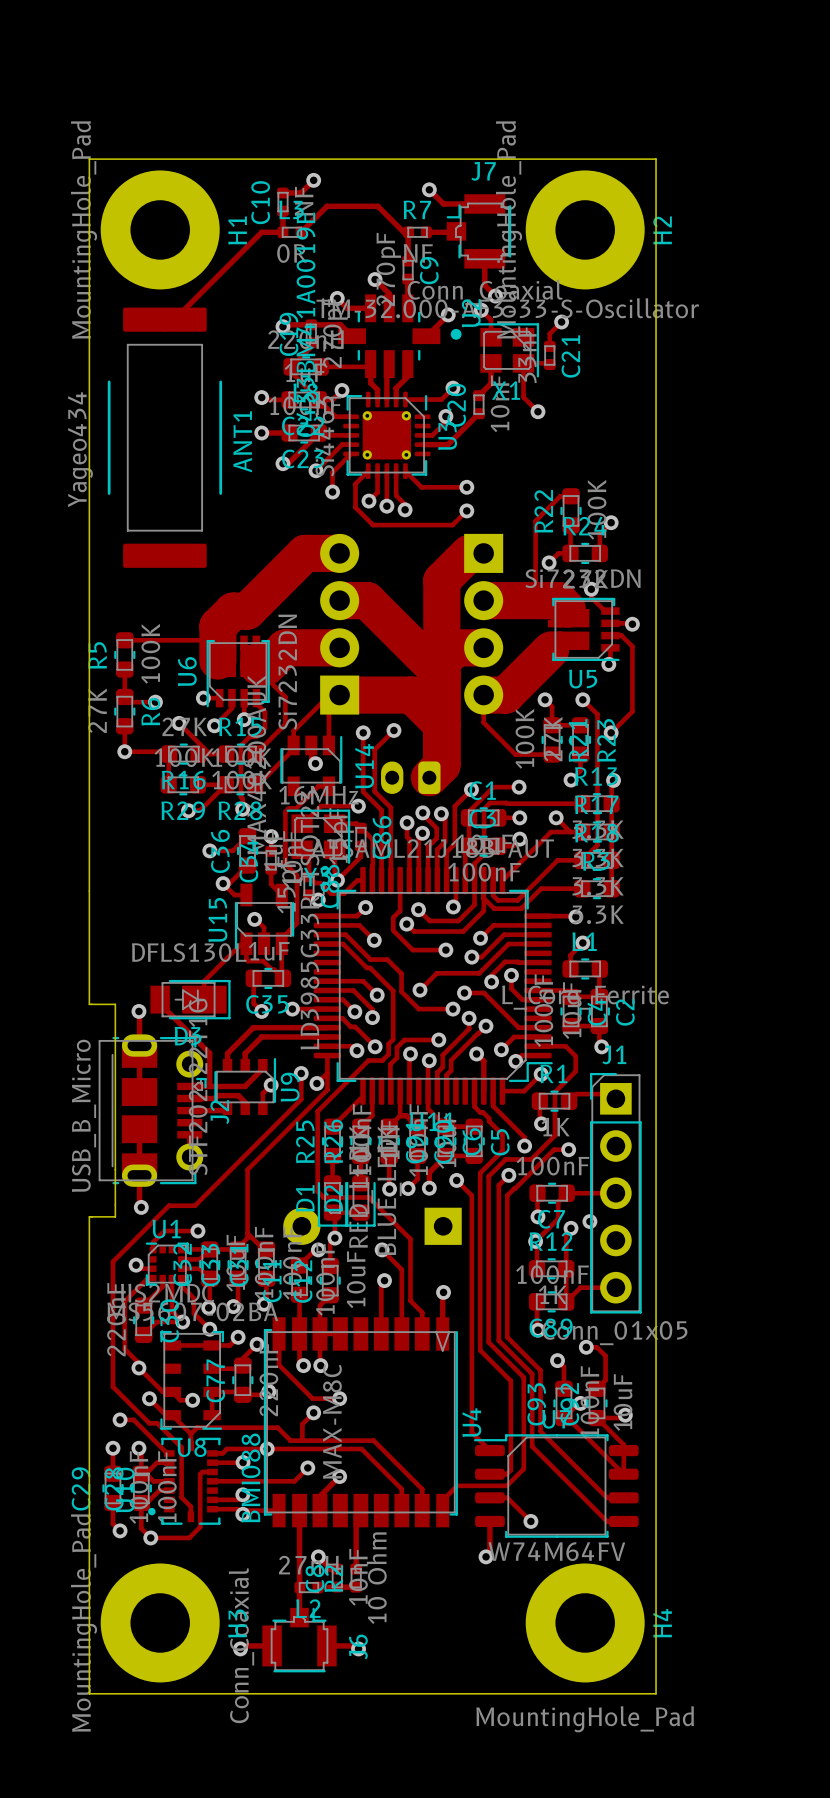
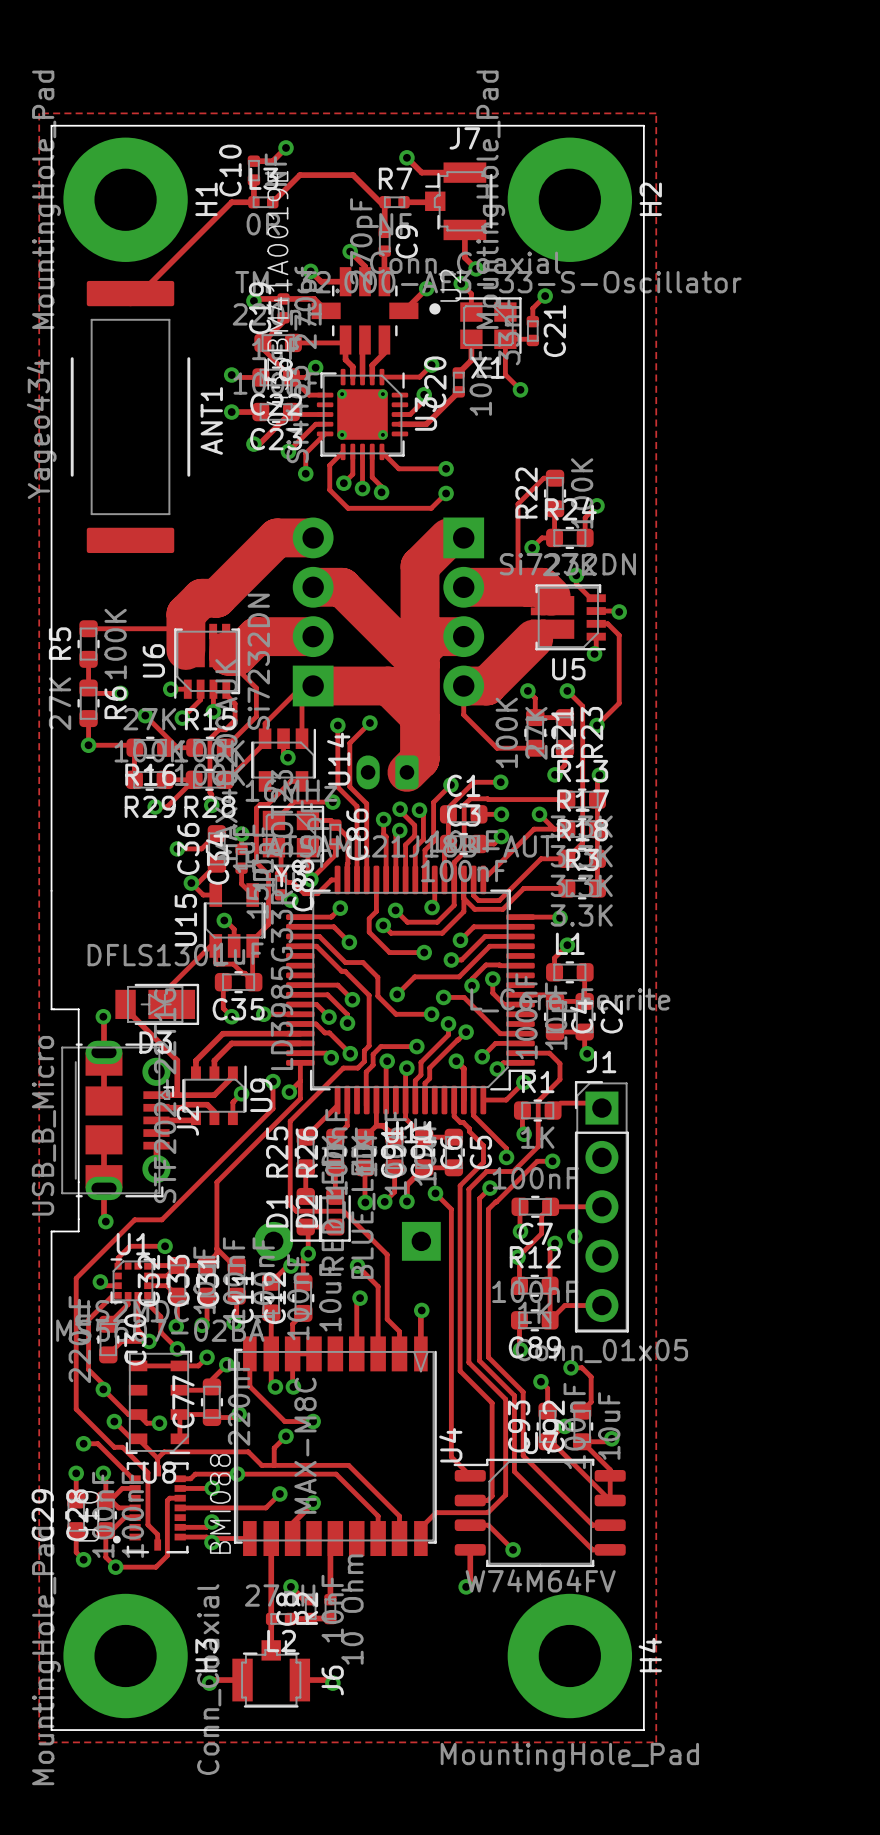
zone outline: none -> (39, 113) (39, 1742) (656, 1742) (656, 113) (39, 113)

